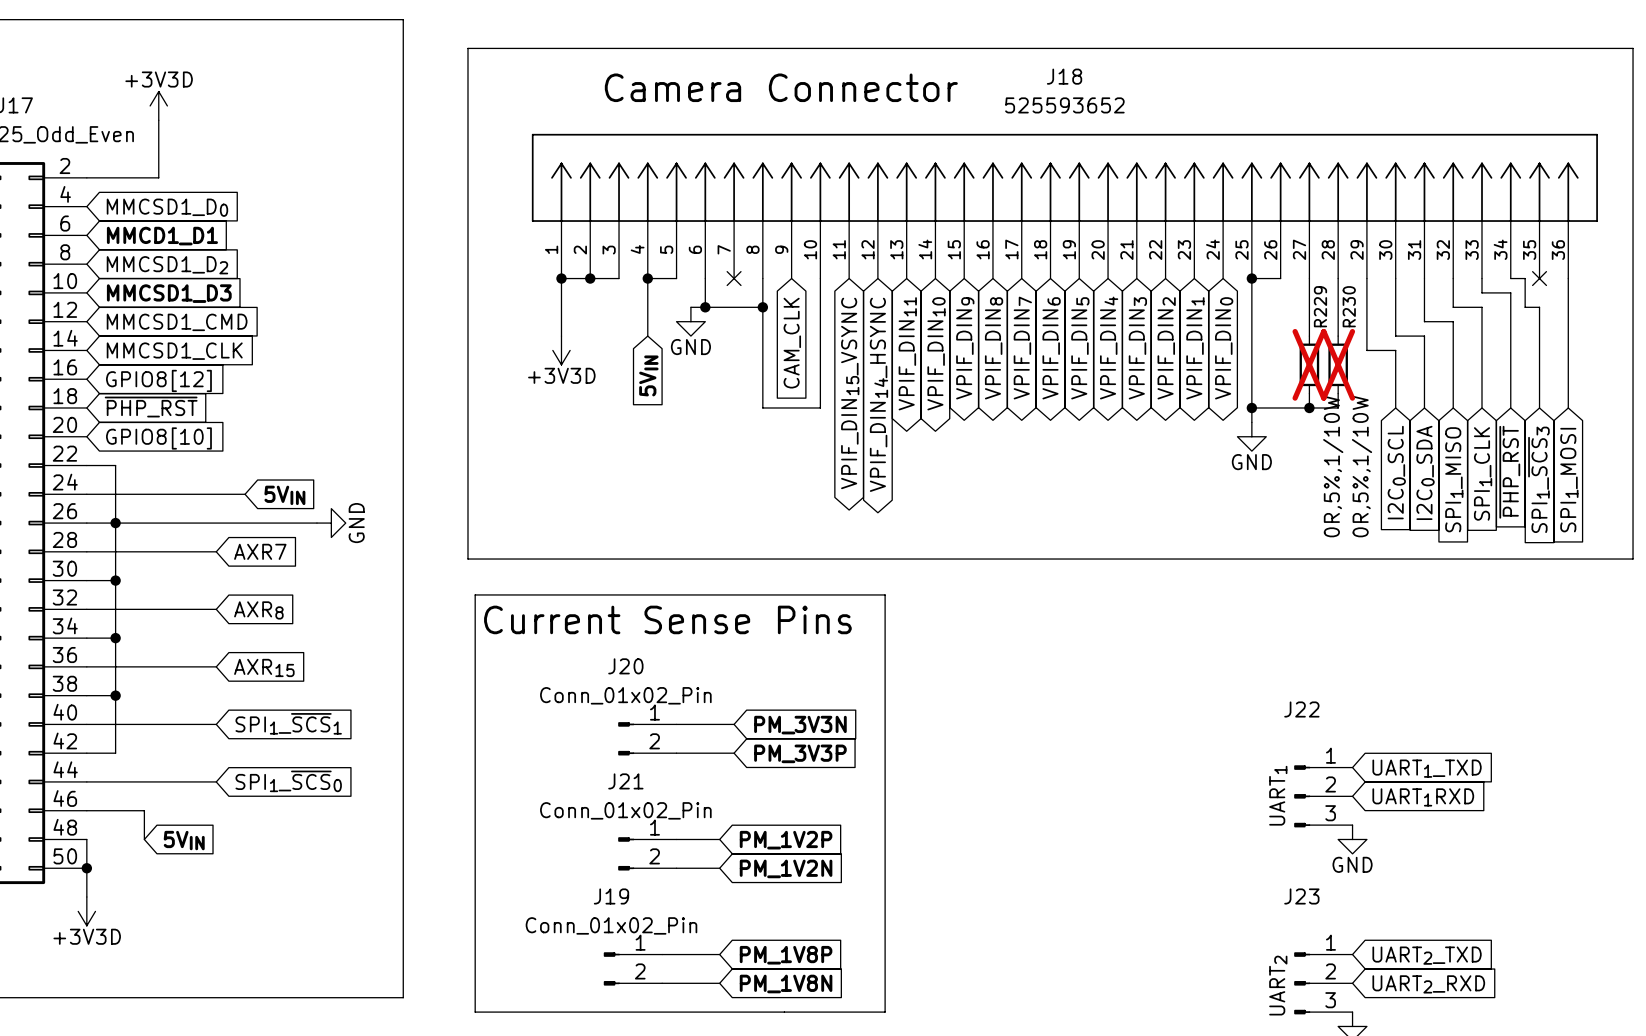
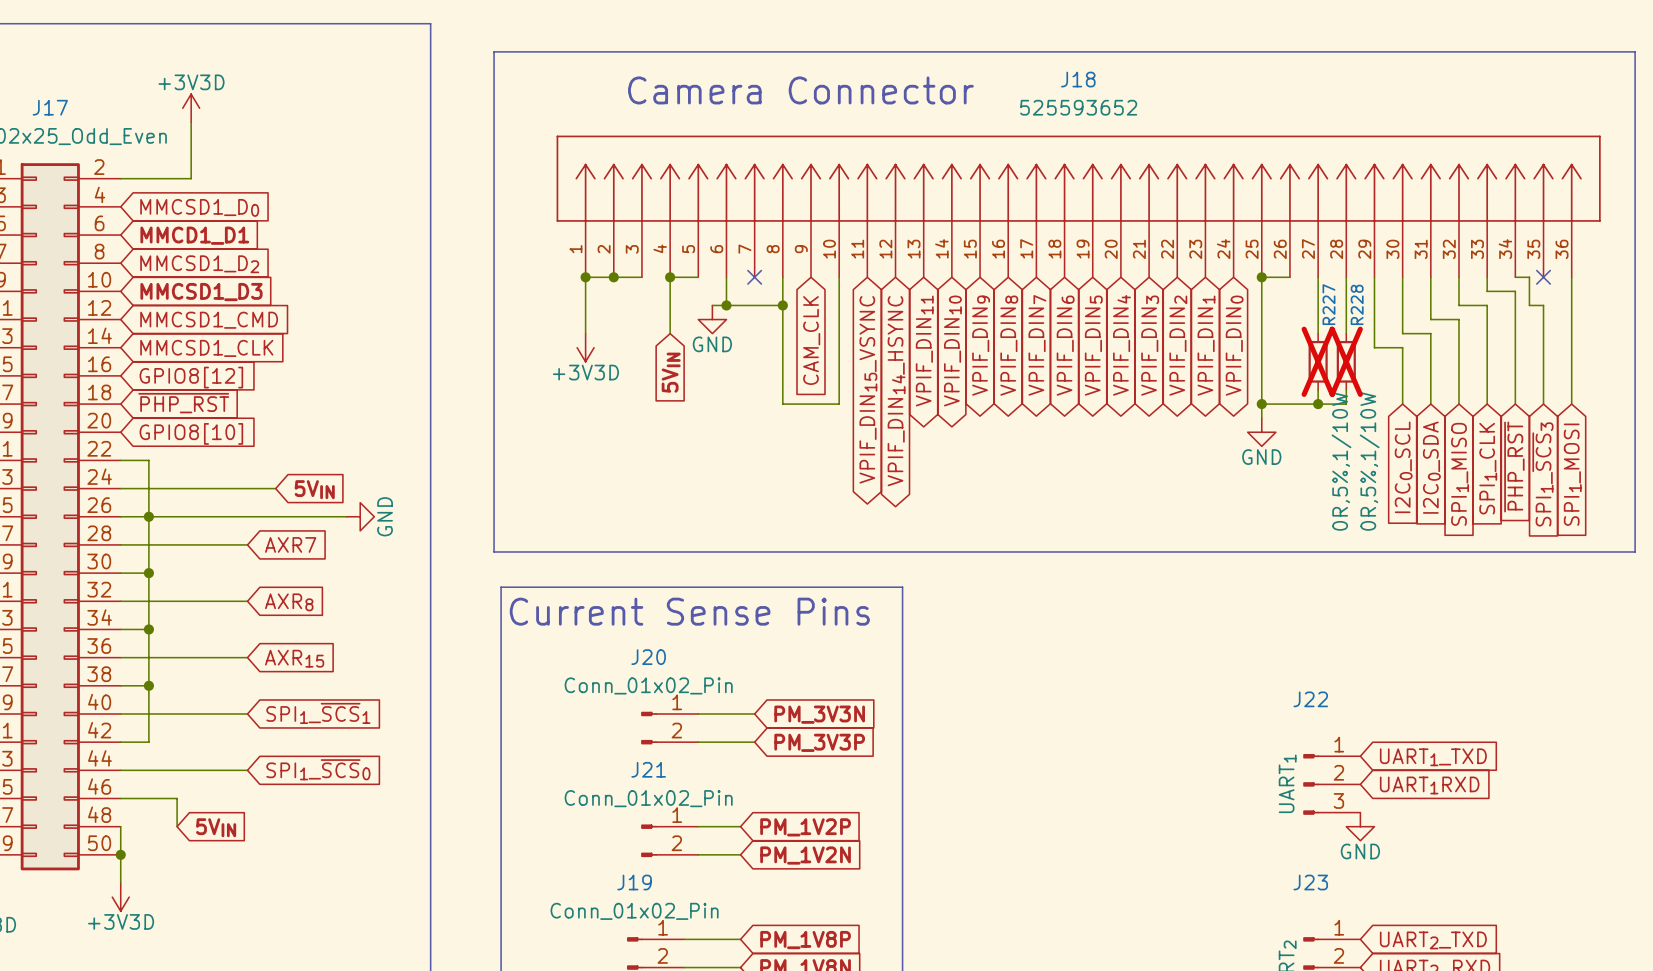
R229 name: R229 (1320, 306) -> R227 (1328, 304)
R230 name: R230 (1349, 306) -> R228 (1357, 304)

